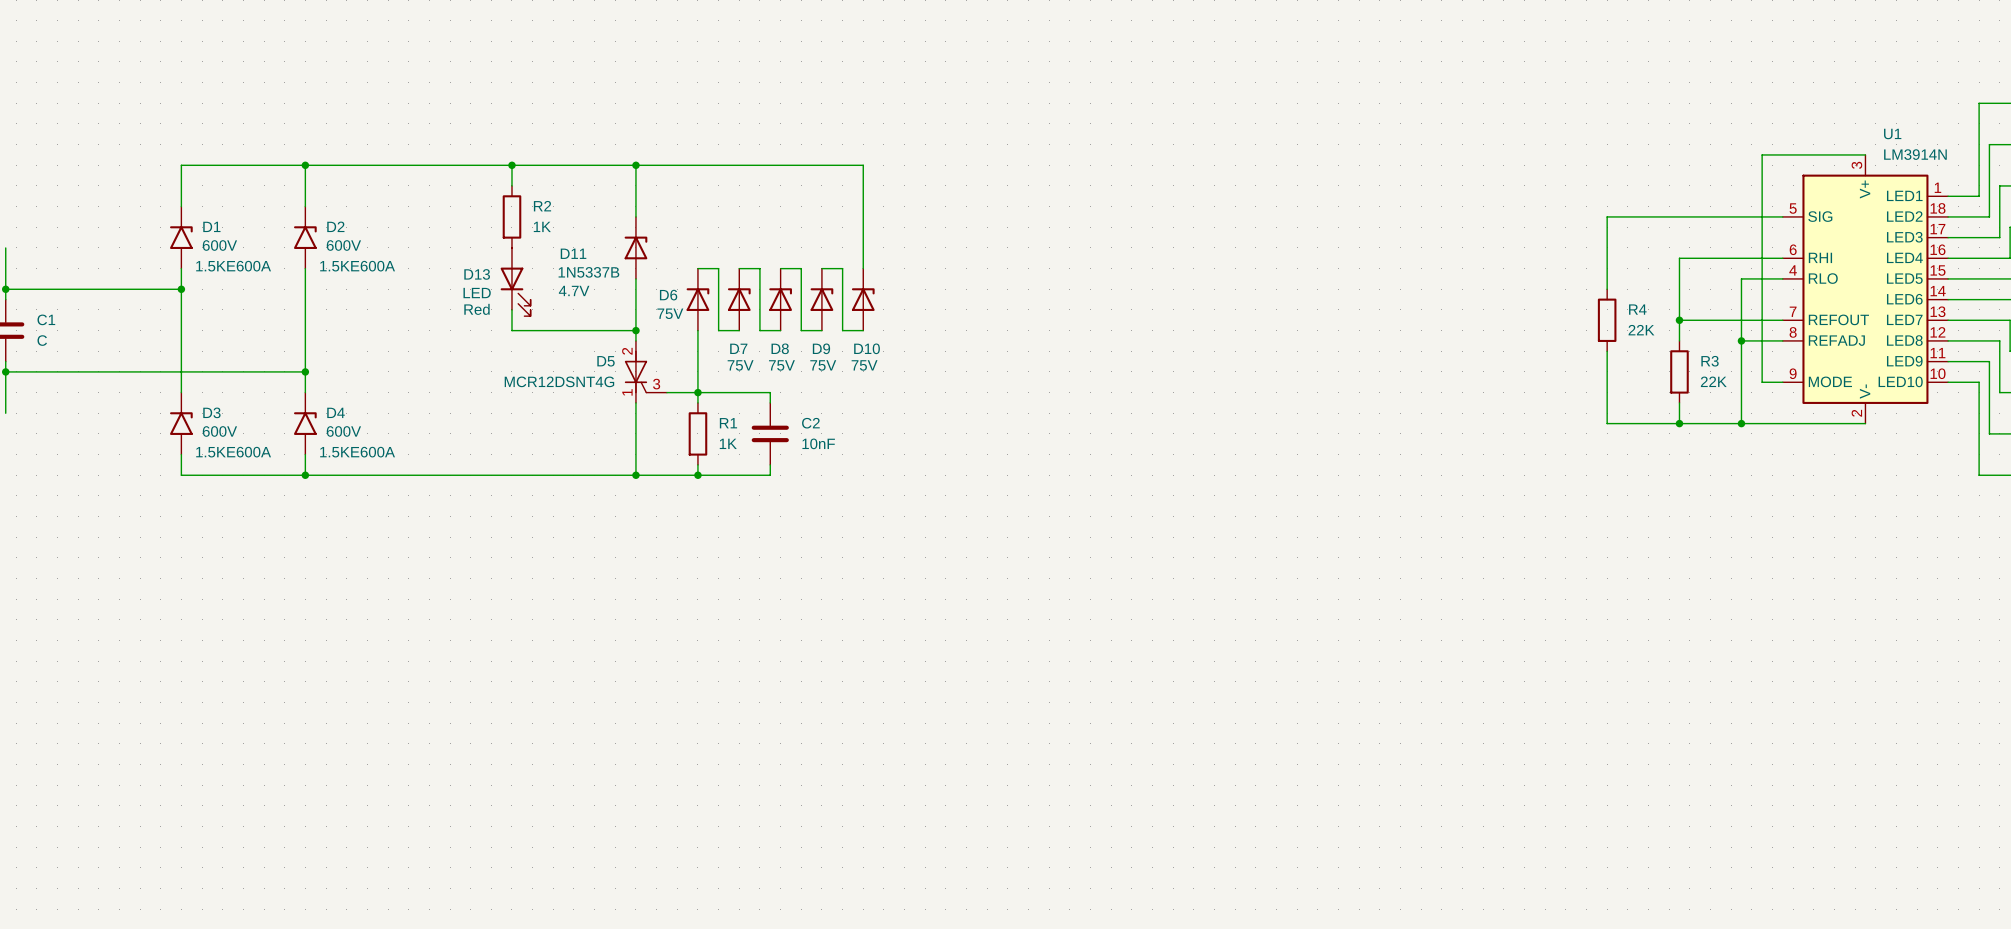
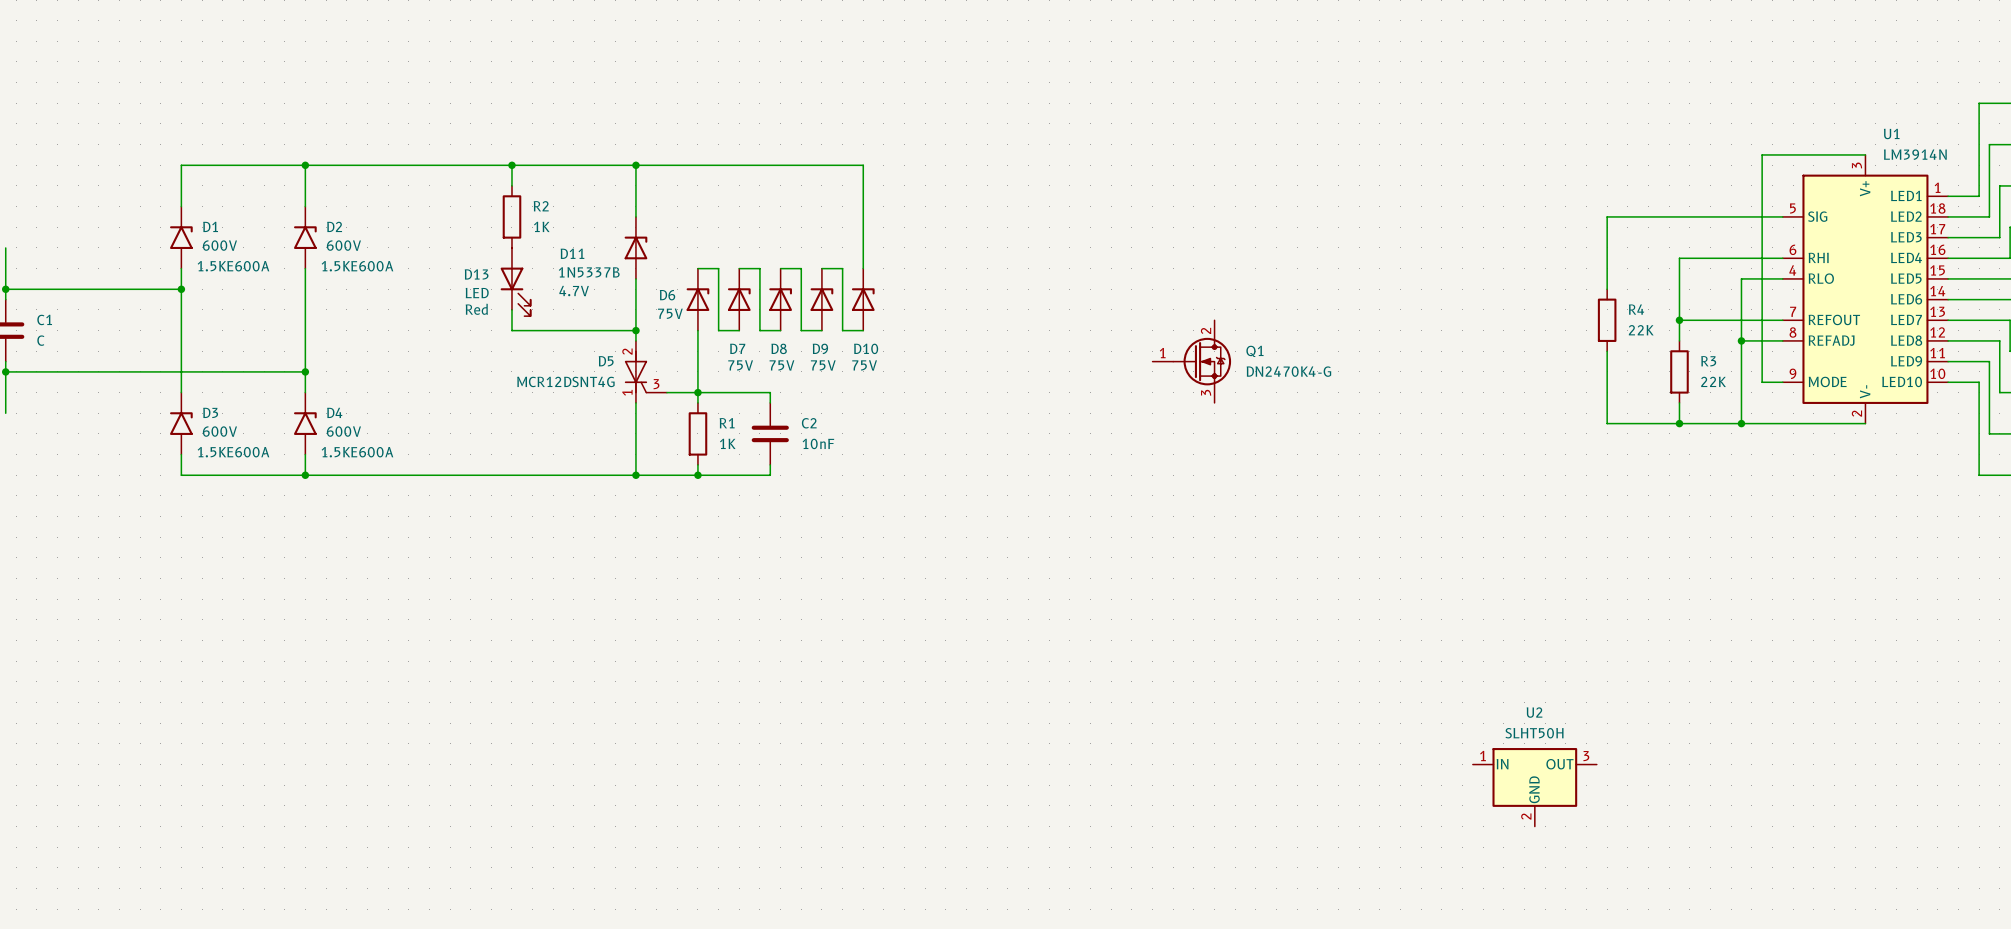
Q1: none -> DN2470K4-G (1191, 361)
U2: none -> SLHT50H (1534, 787)

